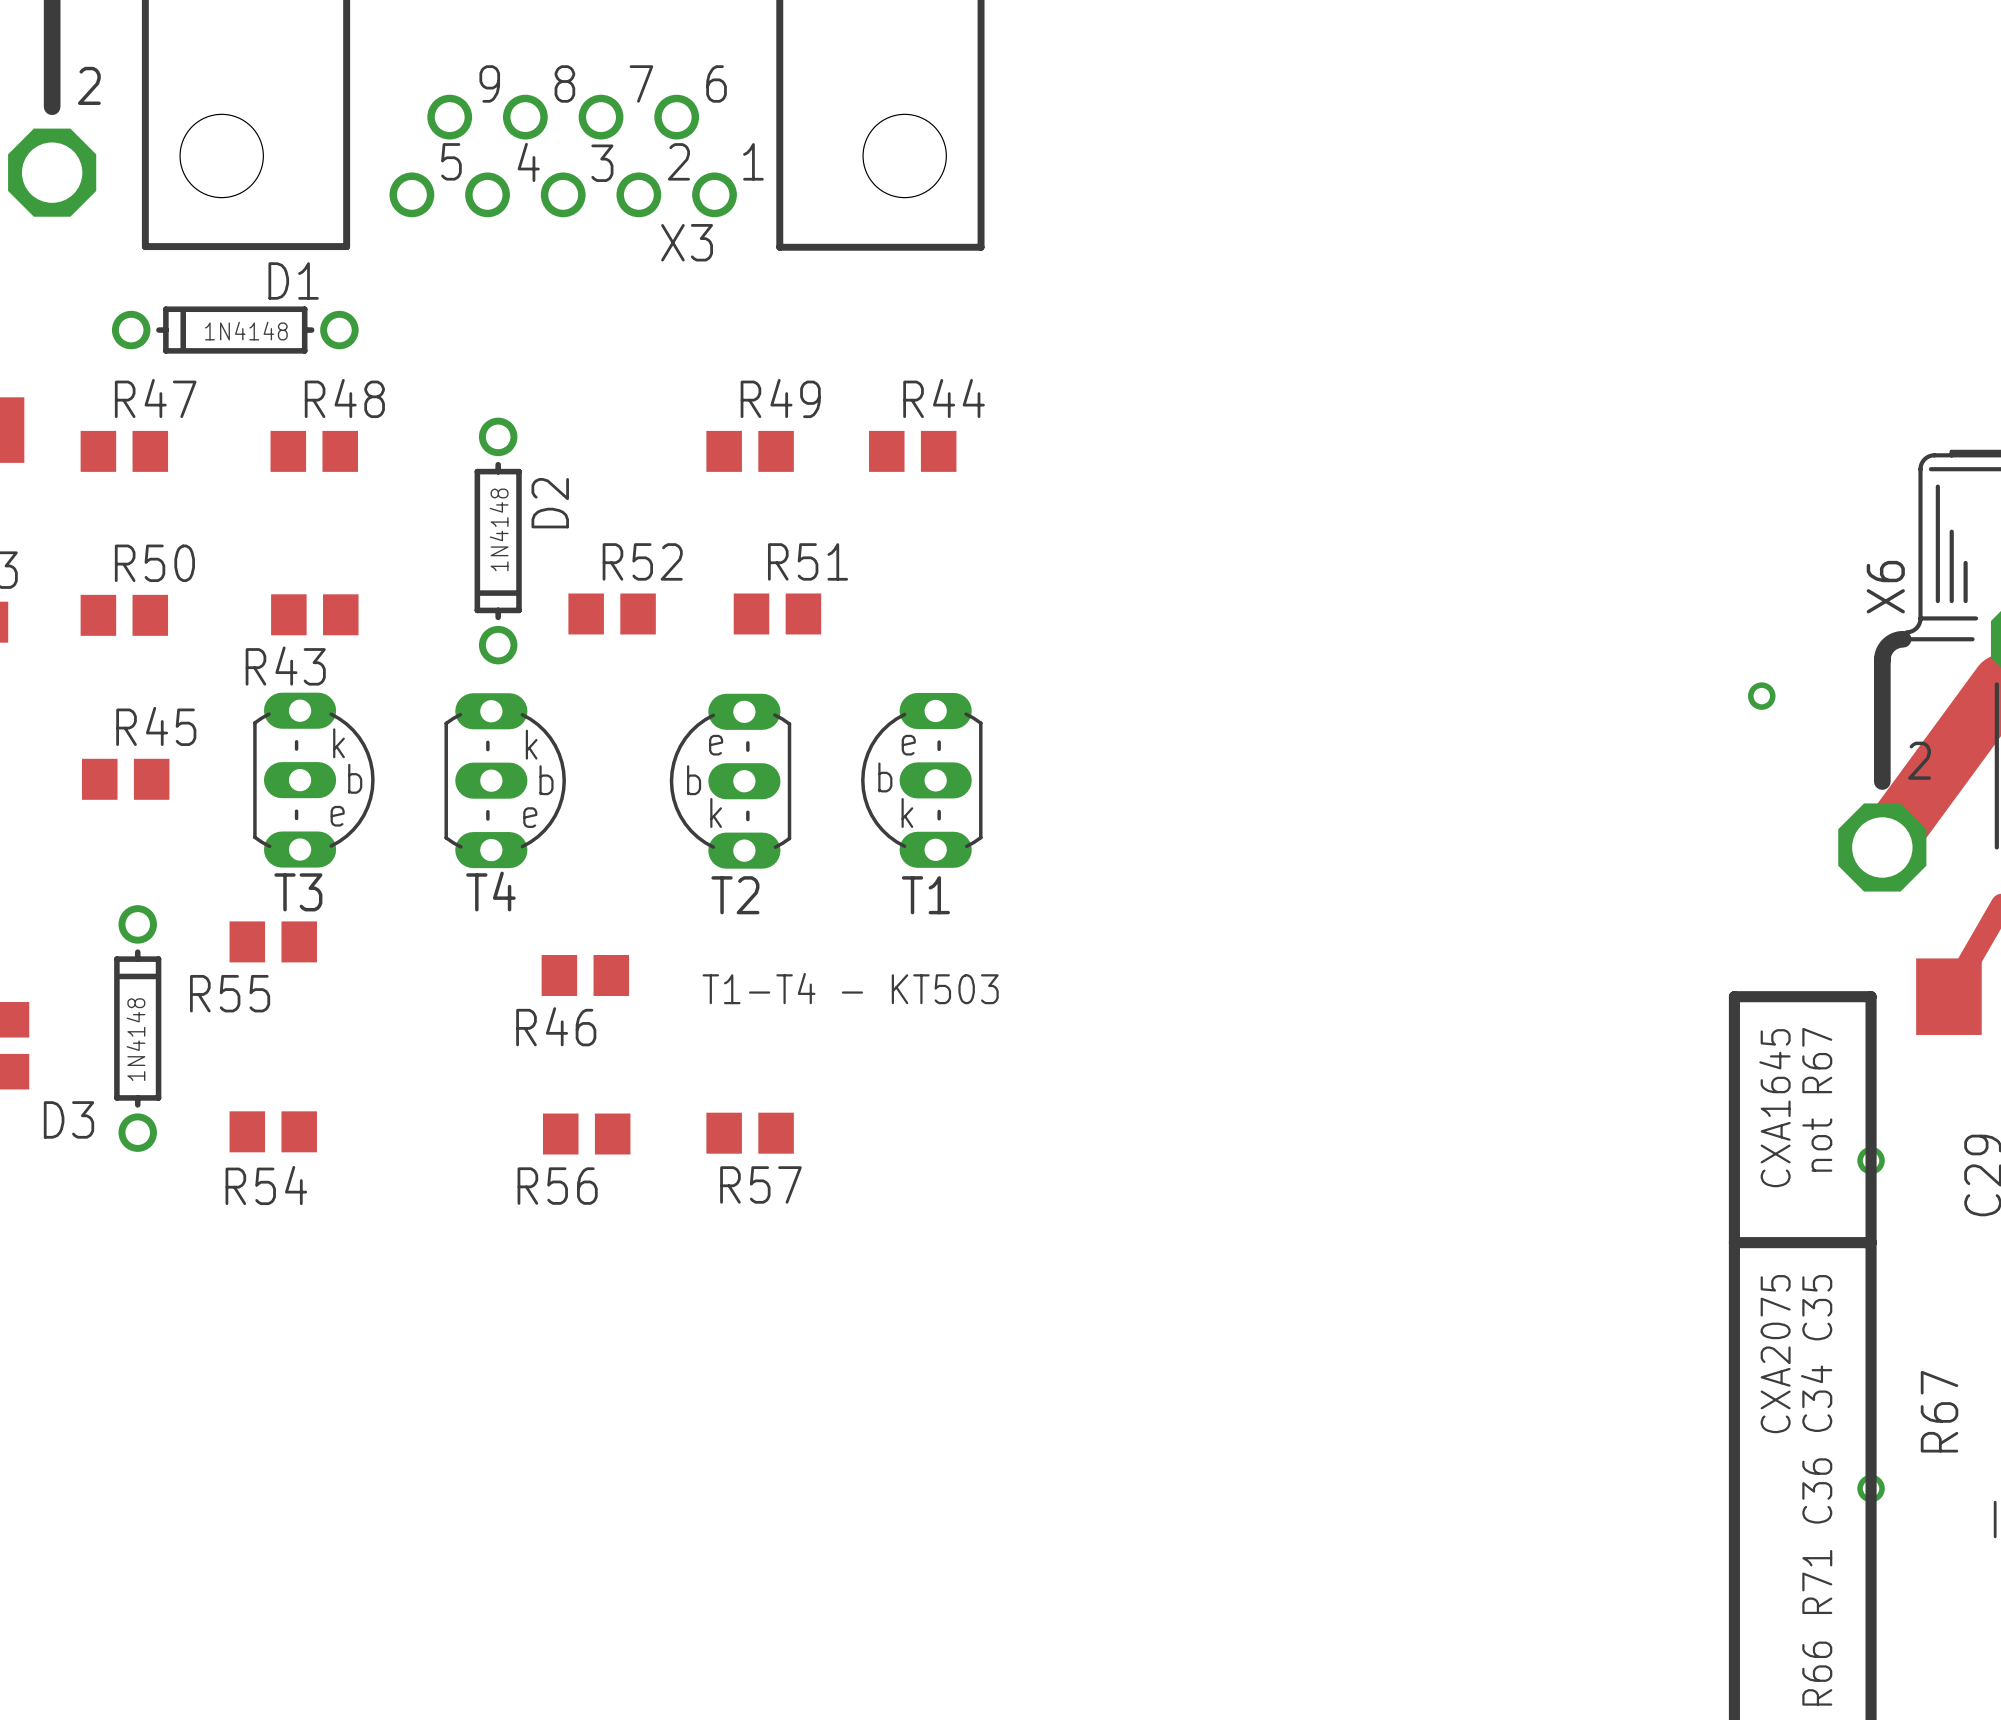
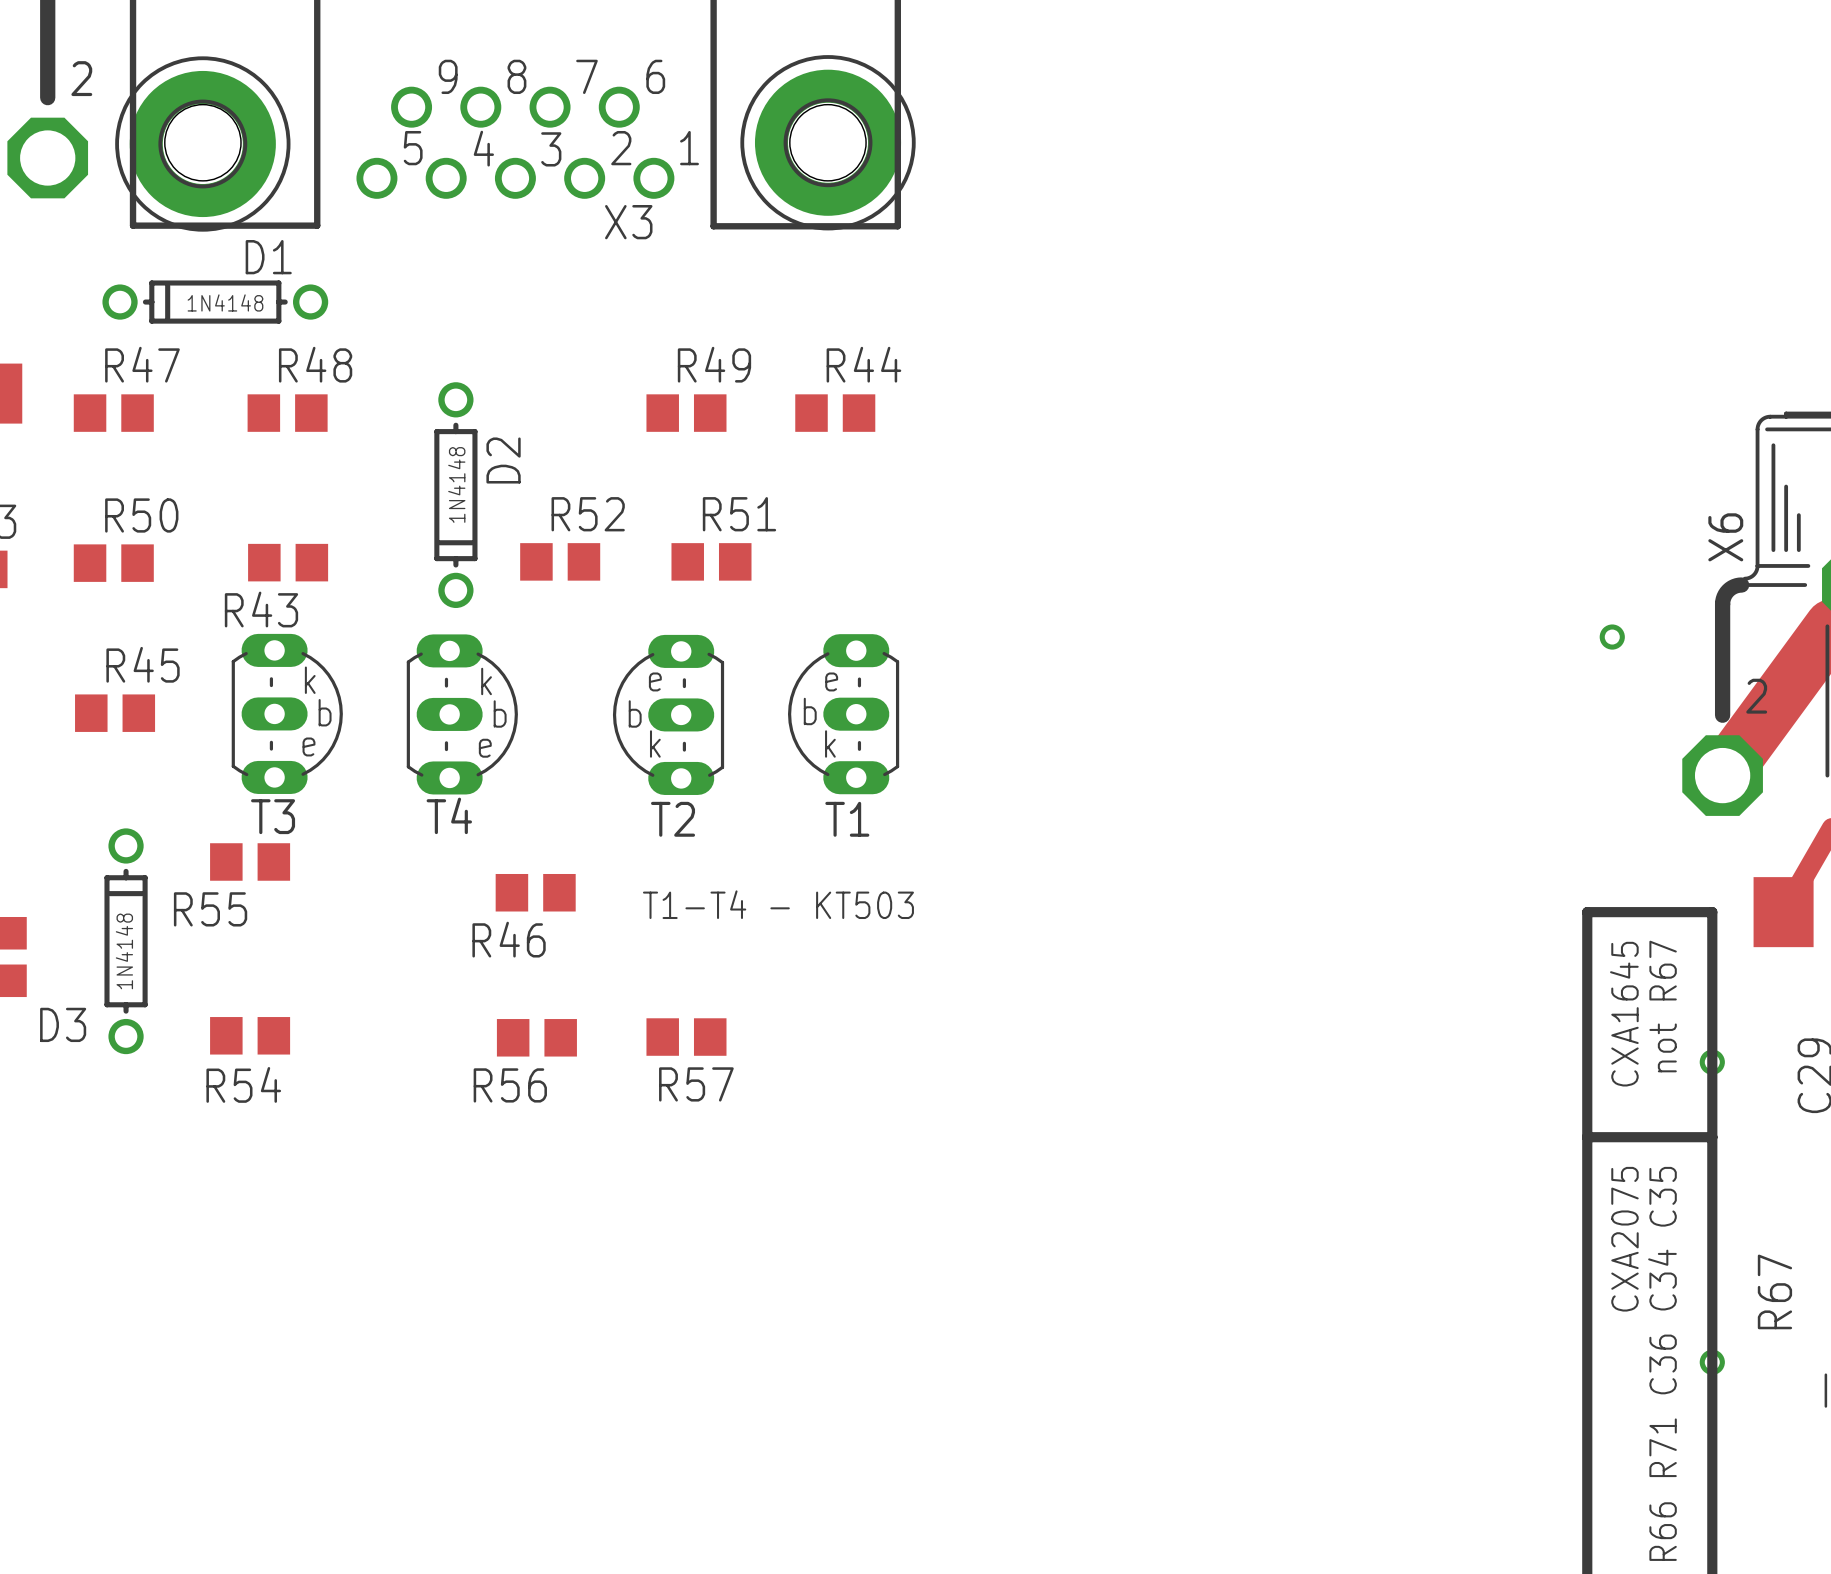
part: none -> (828, 142)
part: none -> (202, 144)

